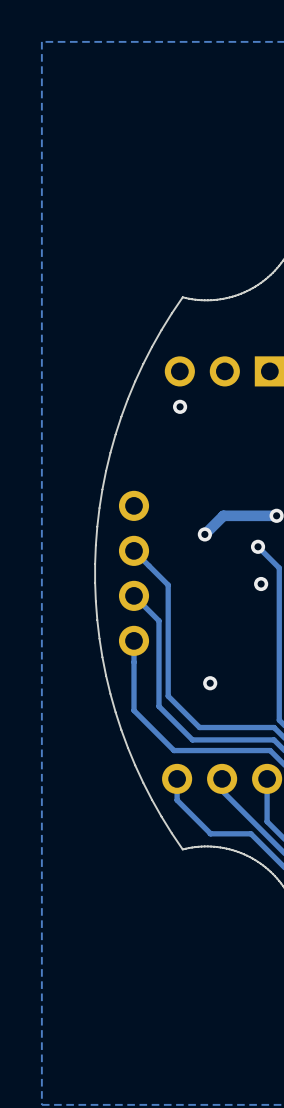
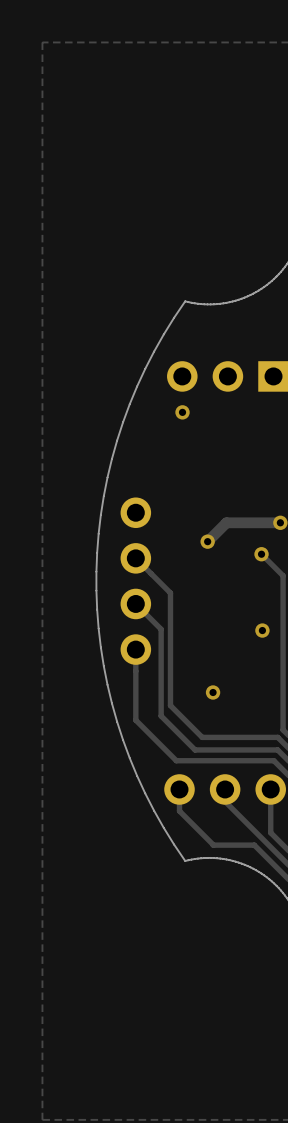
via position: (261, 584) -> (262, 630)

